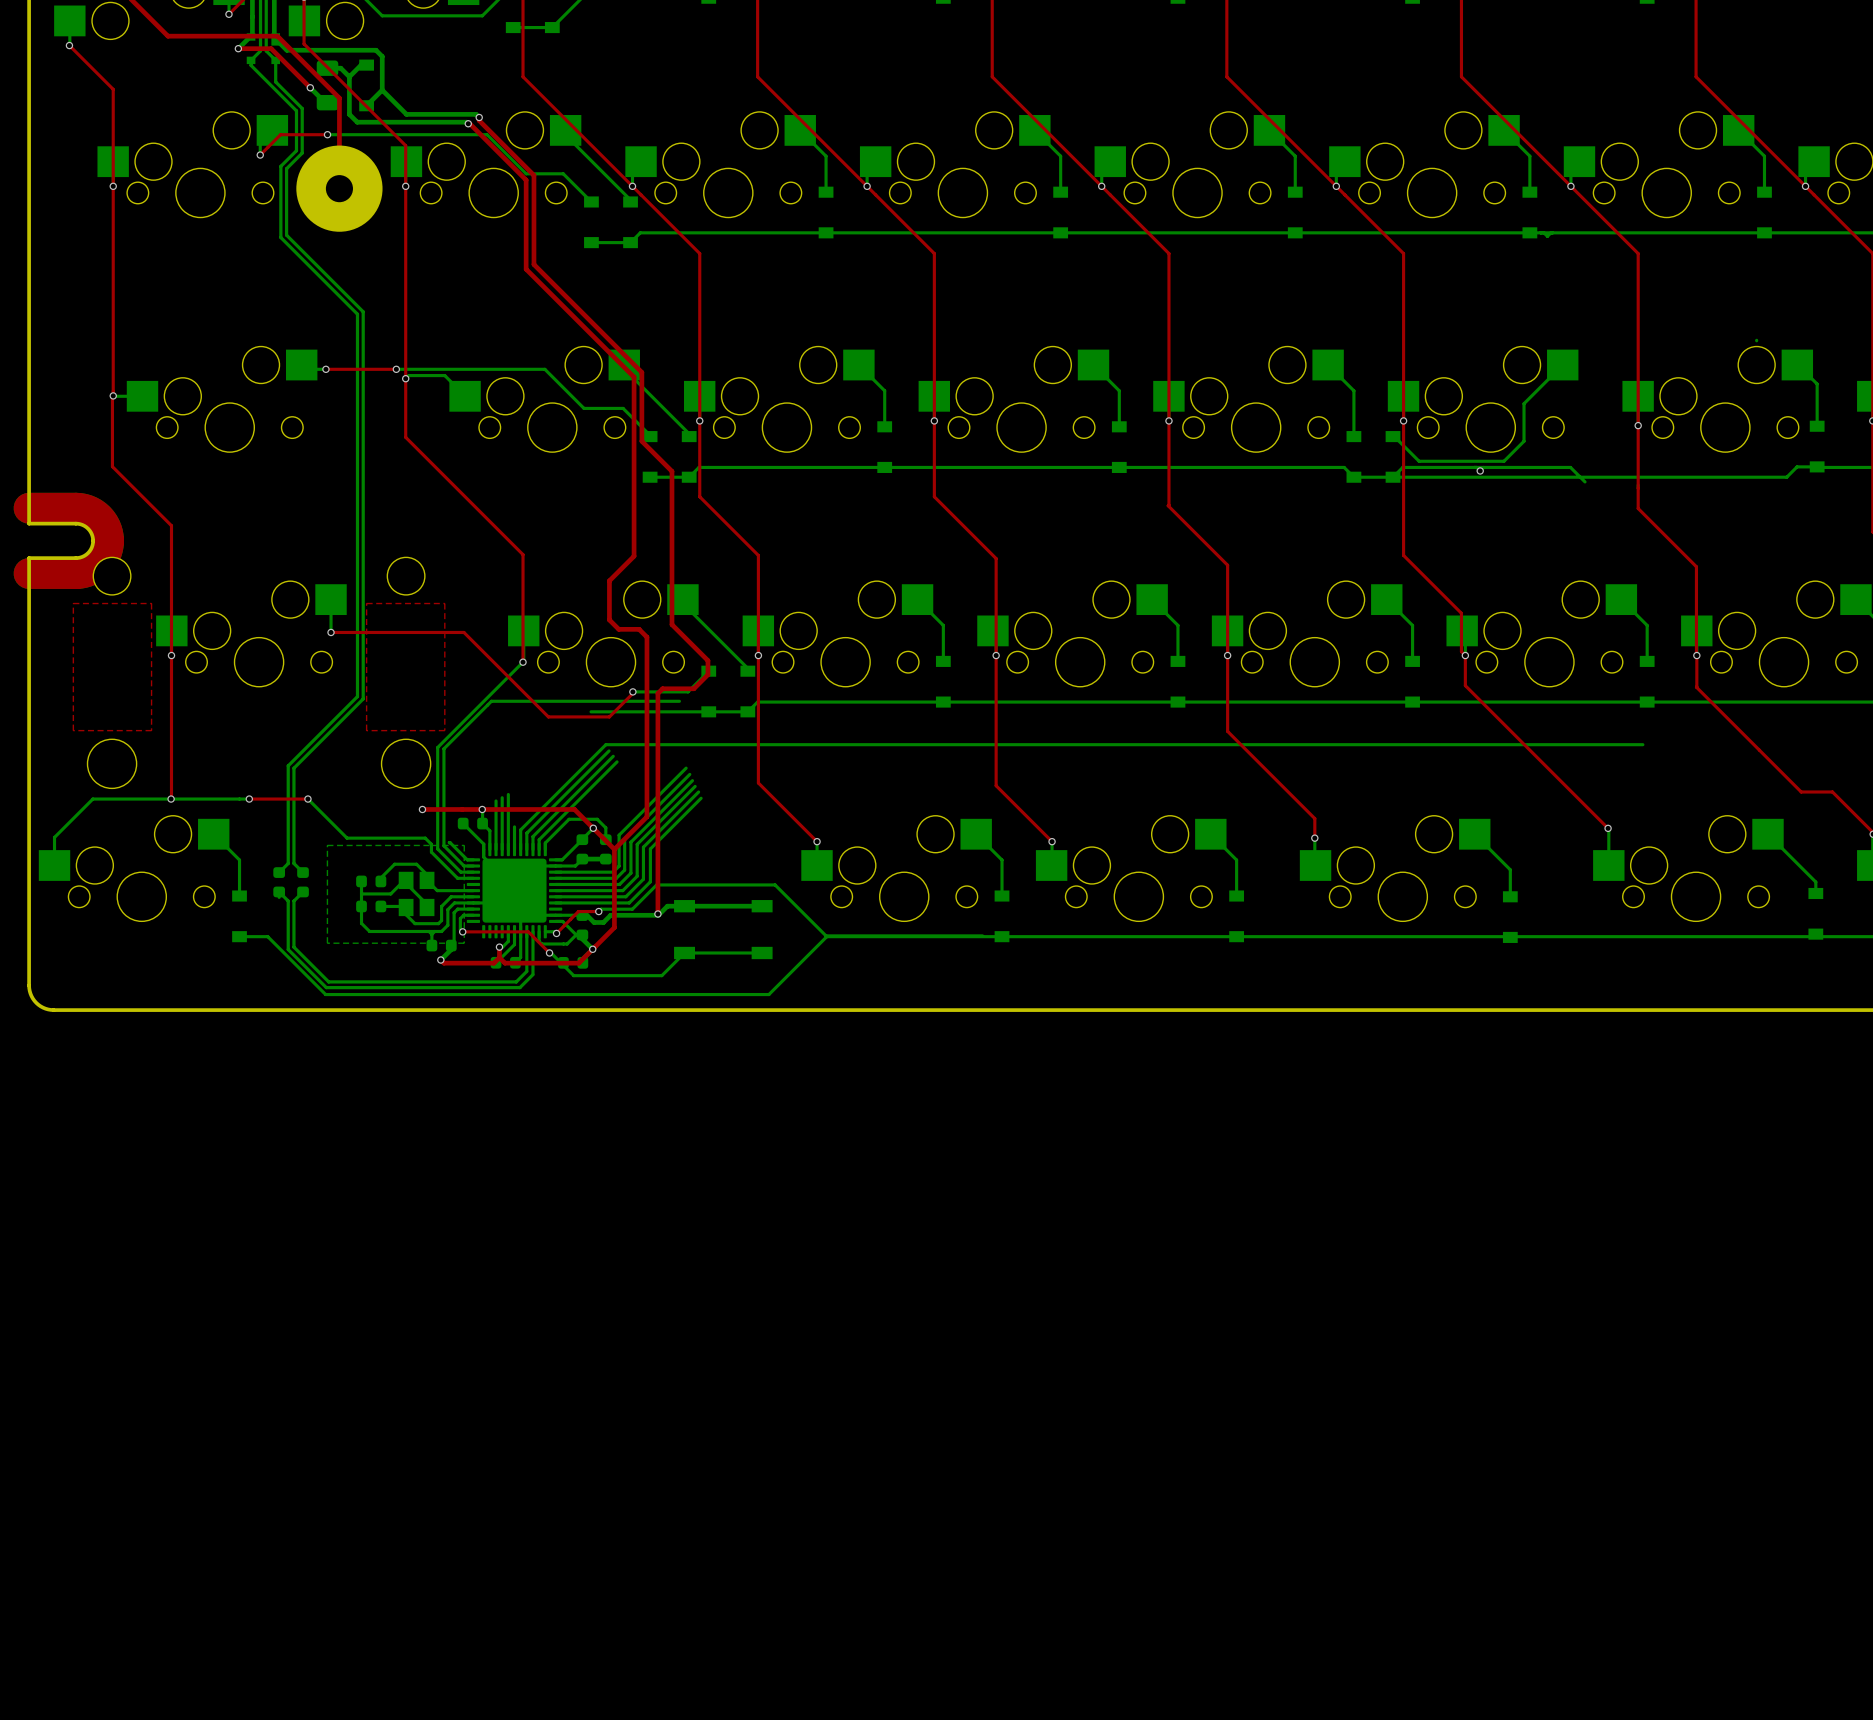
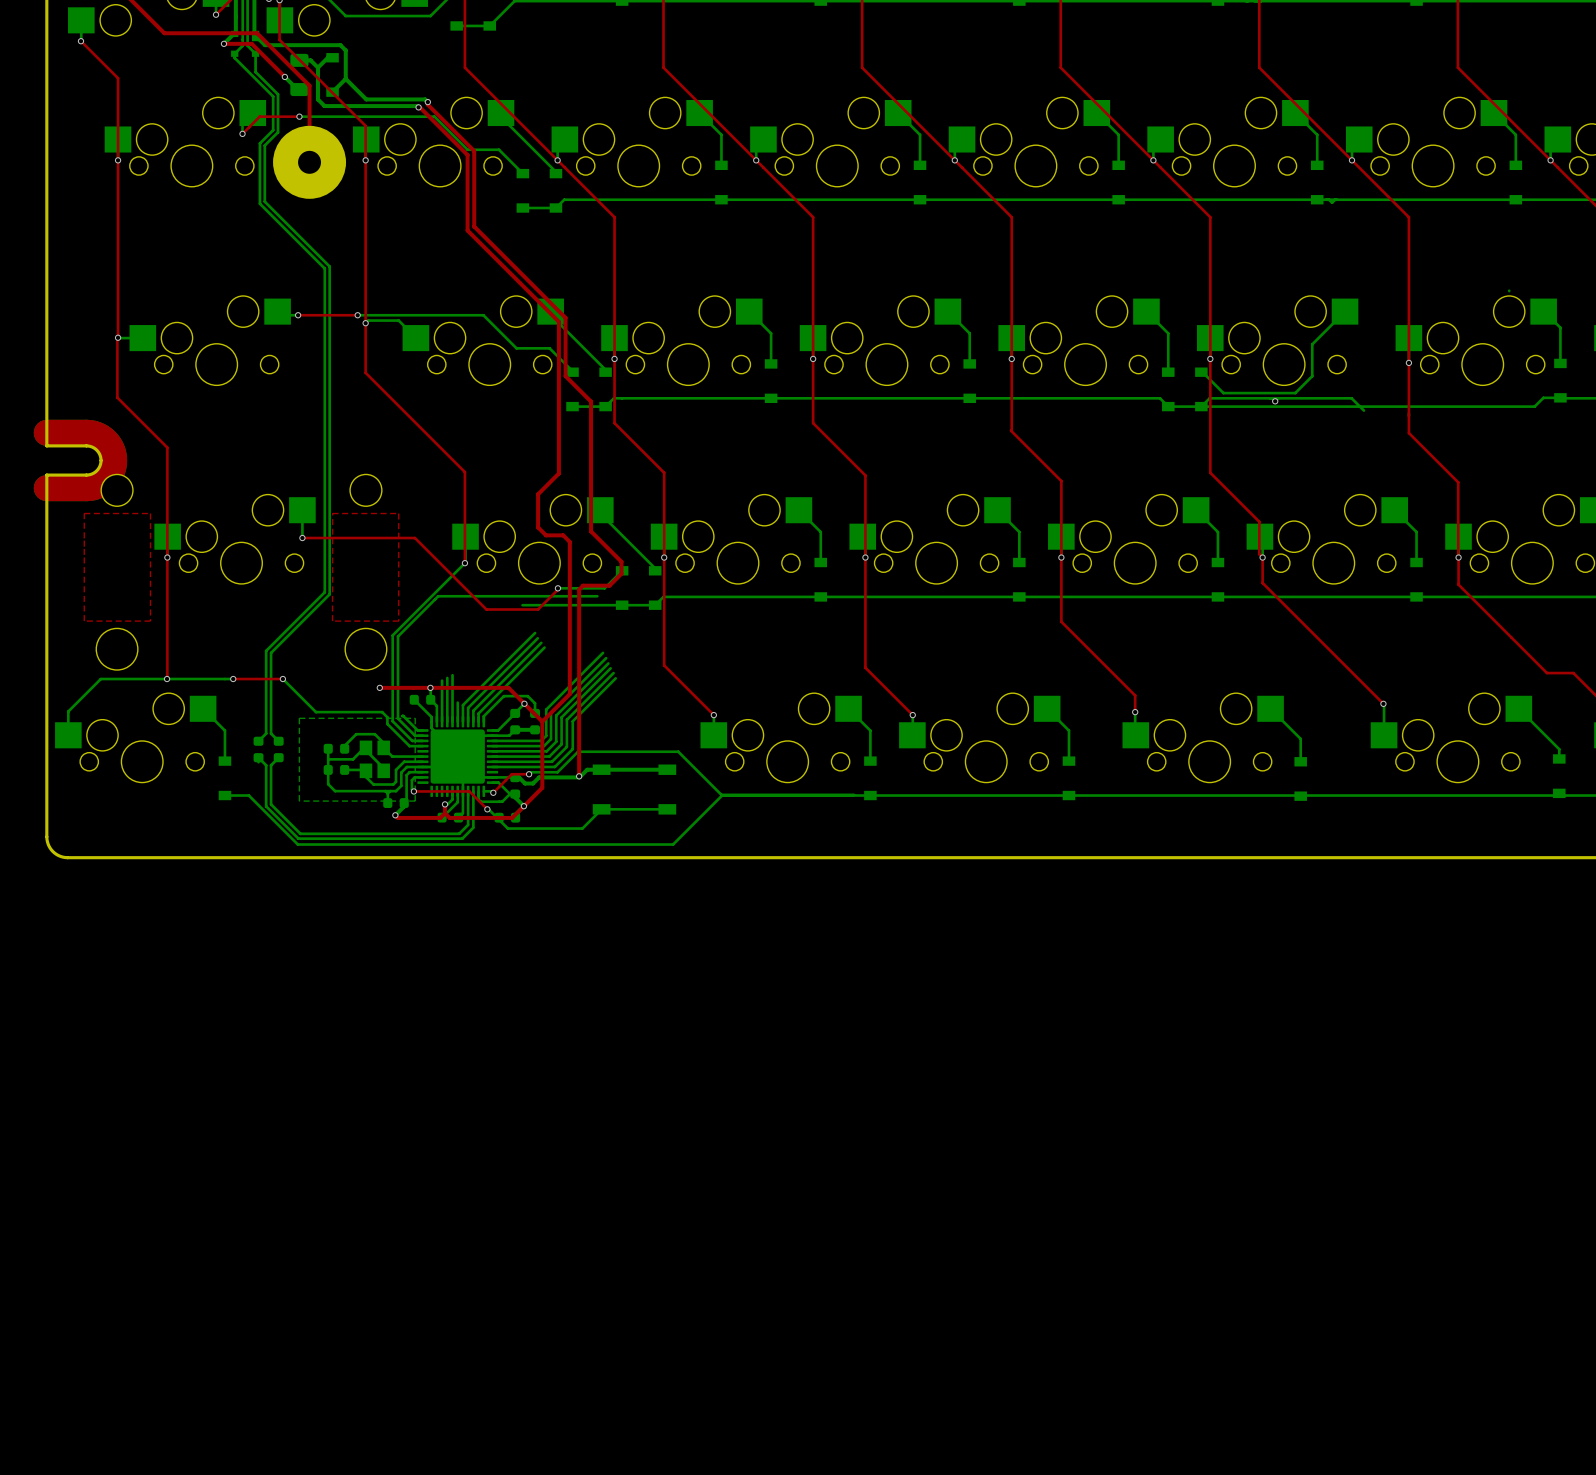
bottom track: (605, 744) (1642, 744) -> none

